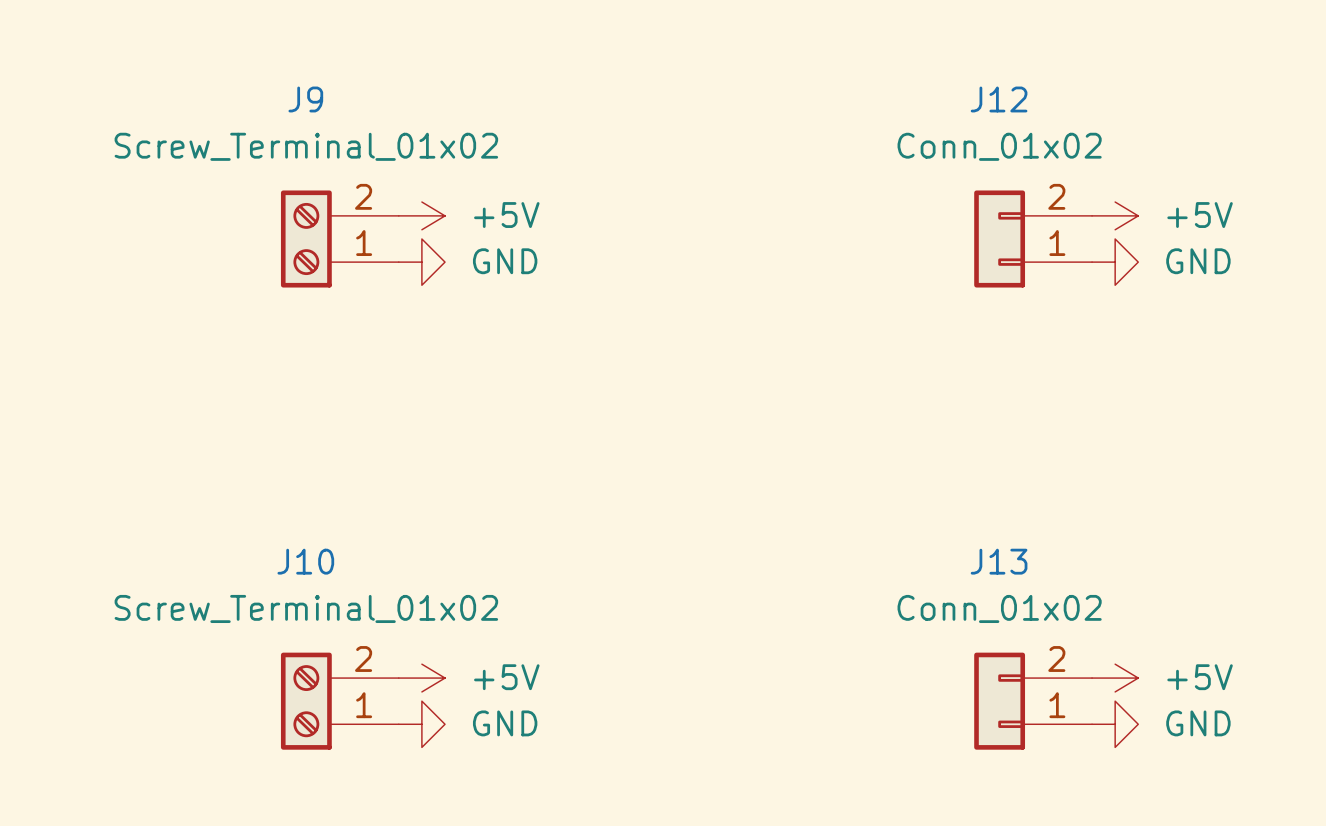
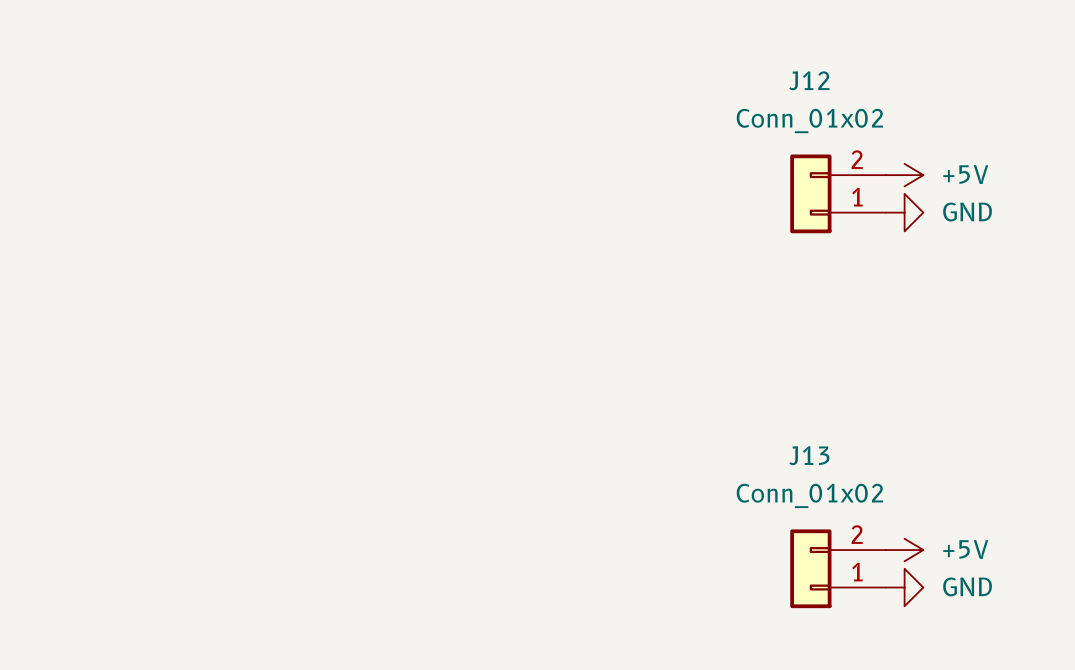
power symbol: +5V (421, 215) -> none
J9: Screw_Terminal_01x02 (339, 239) -> none
power symbol: GND (421, 262) -> none
power symbol: +5V (421, 678) -> none
J10: Screw_Terminal_01x02 (339, 701) -> none
power symbol: GND (421, 724) -> none

